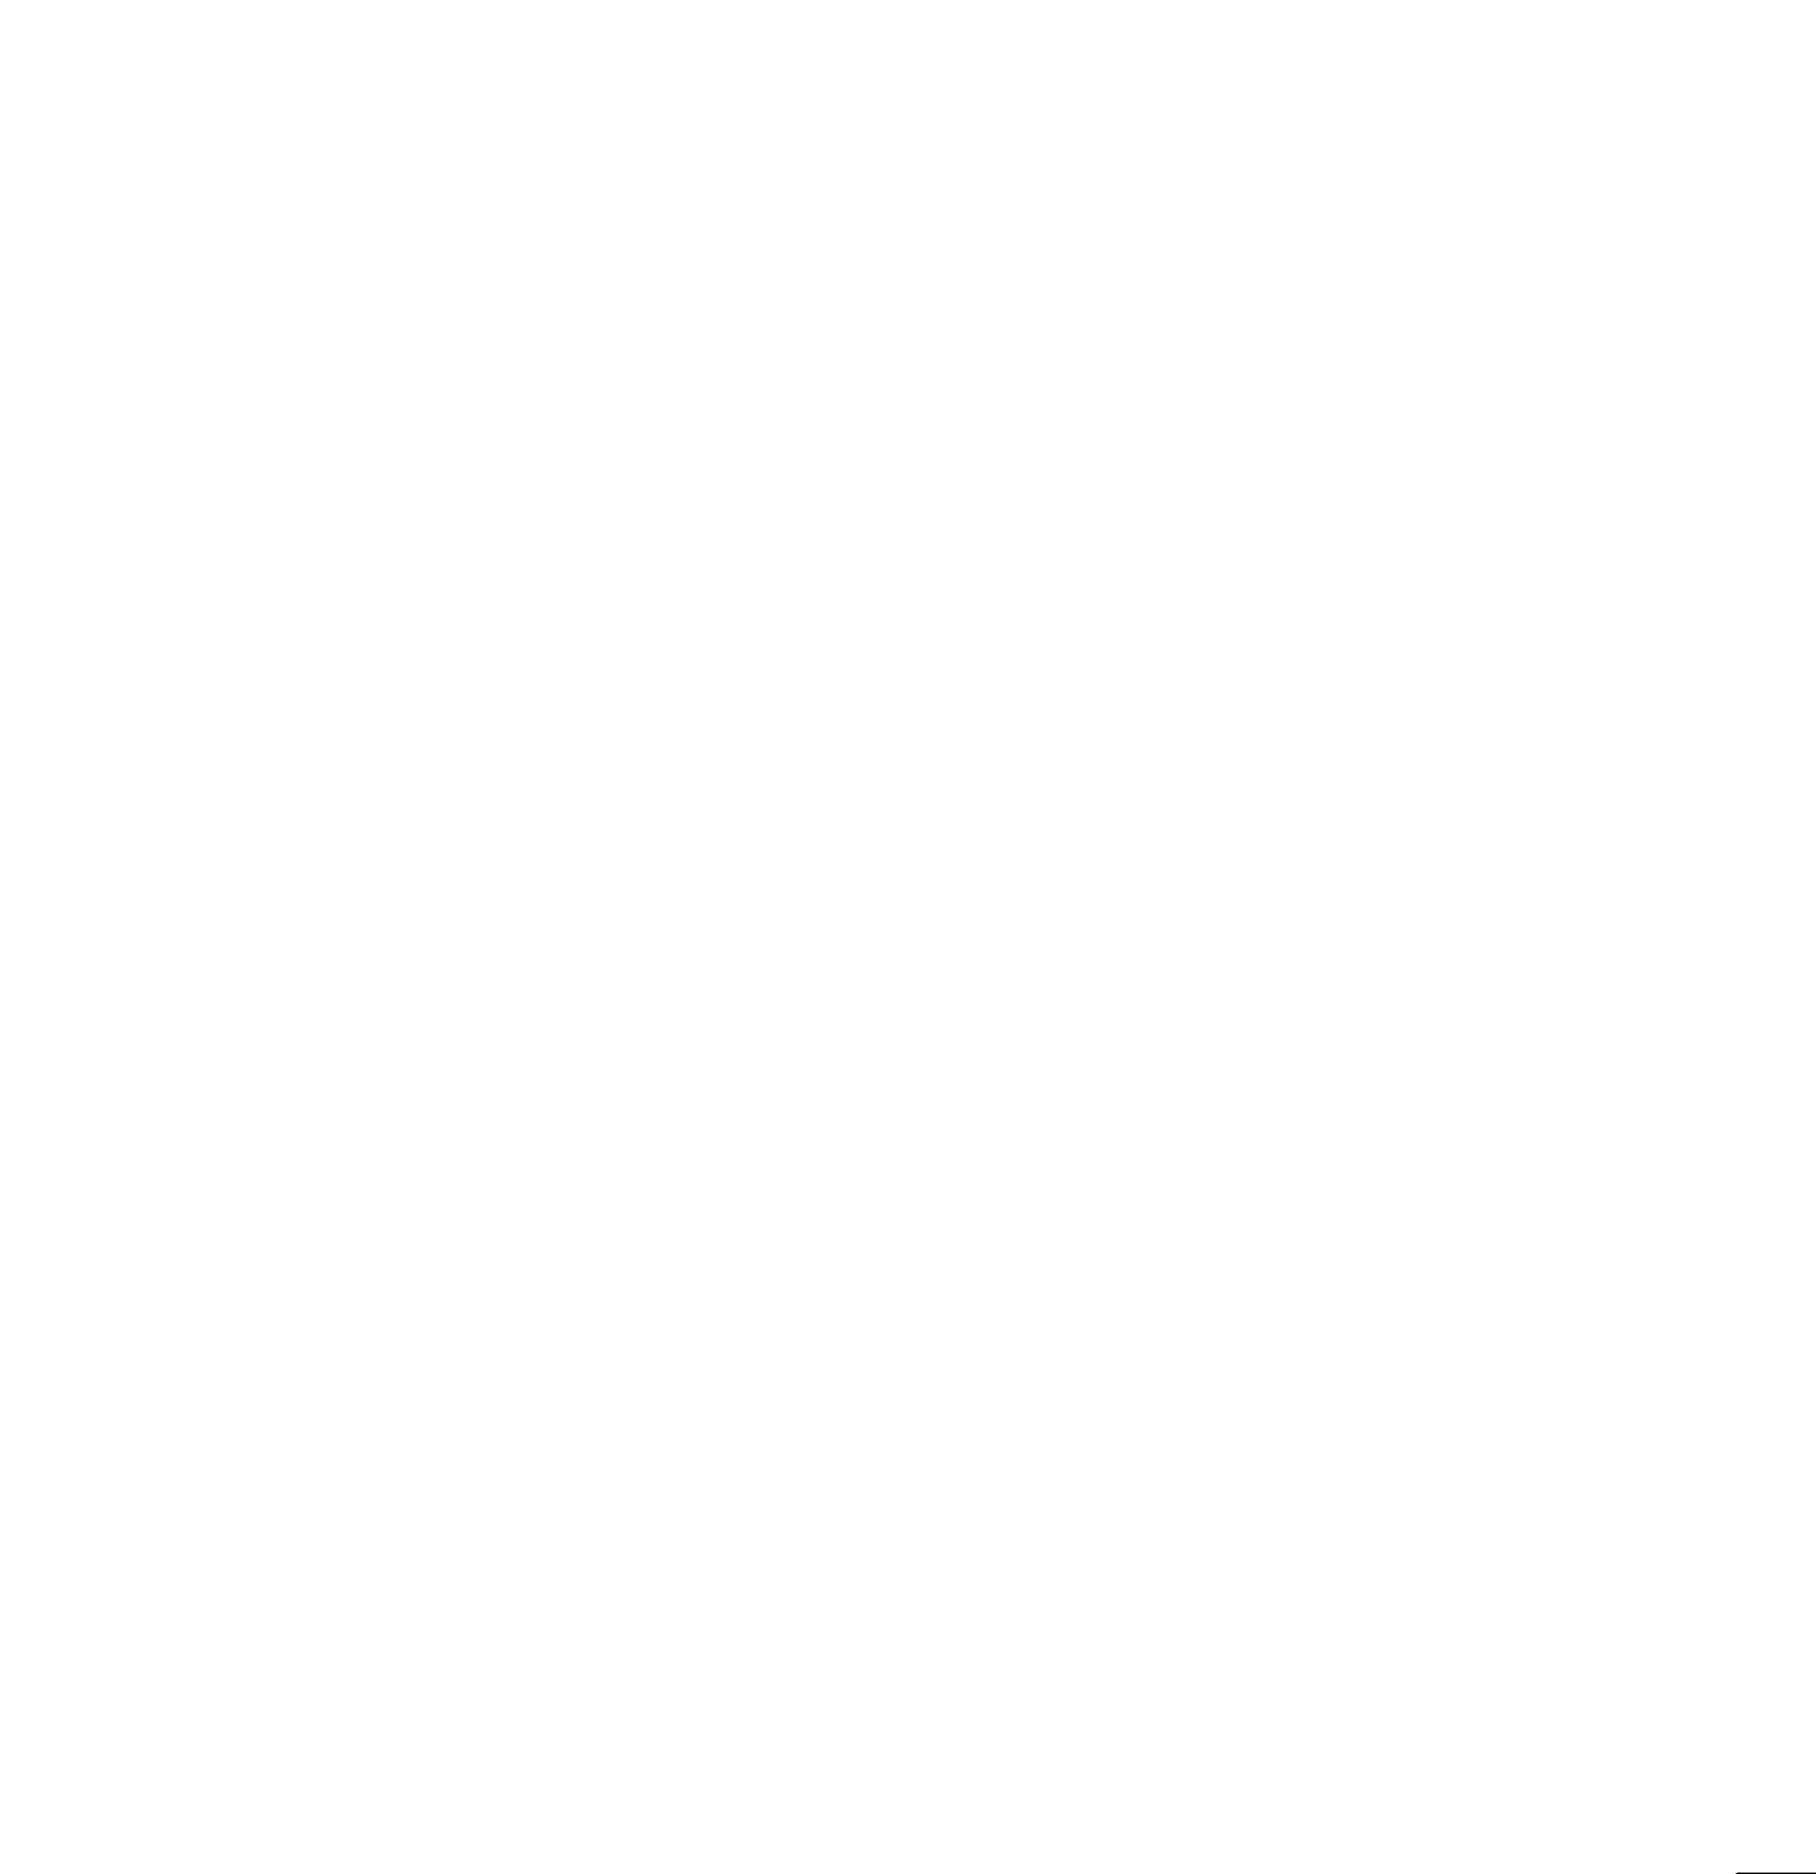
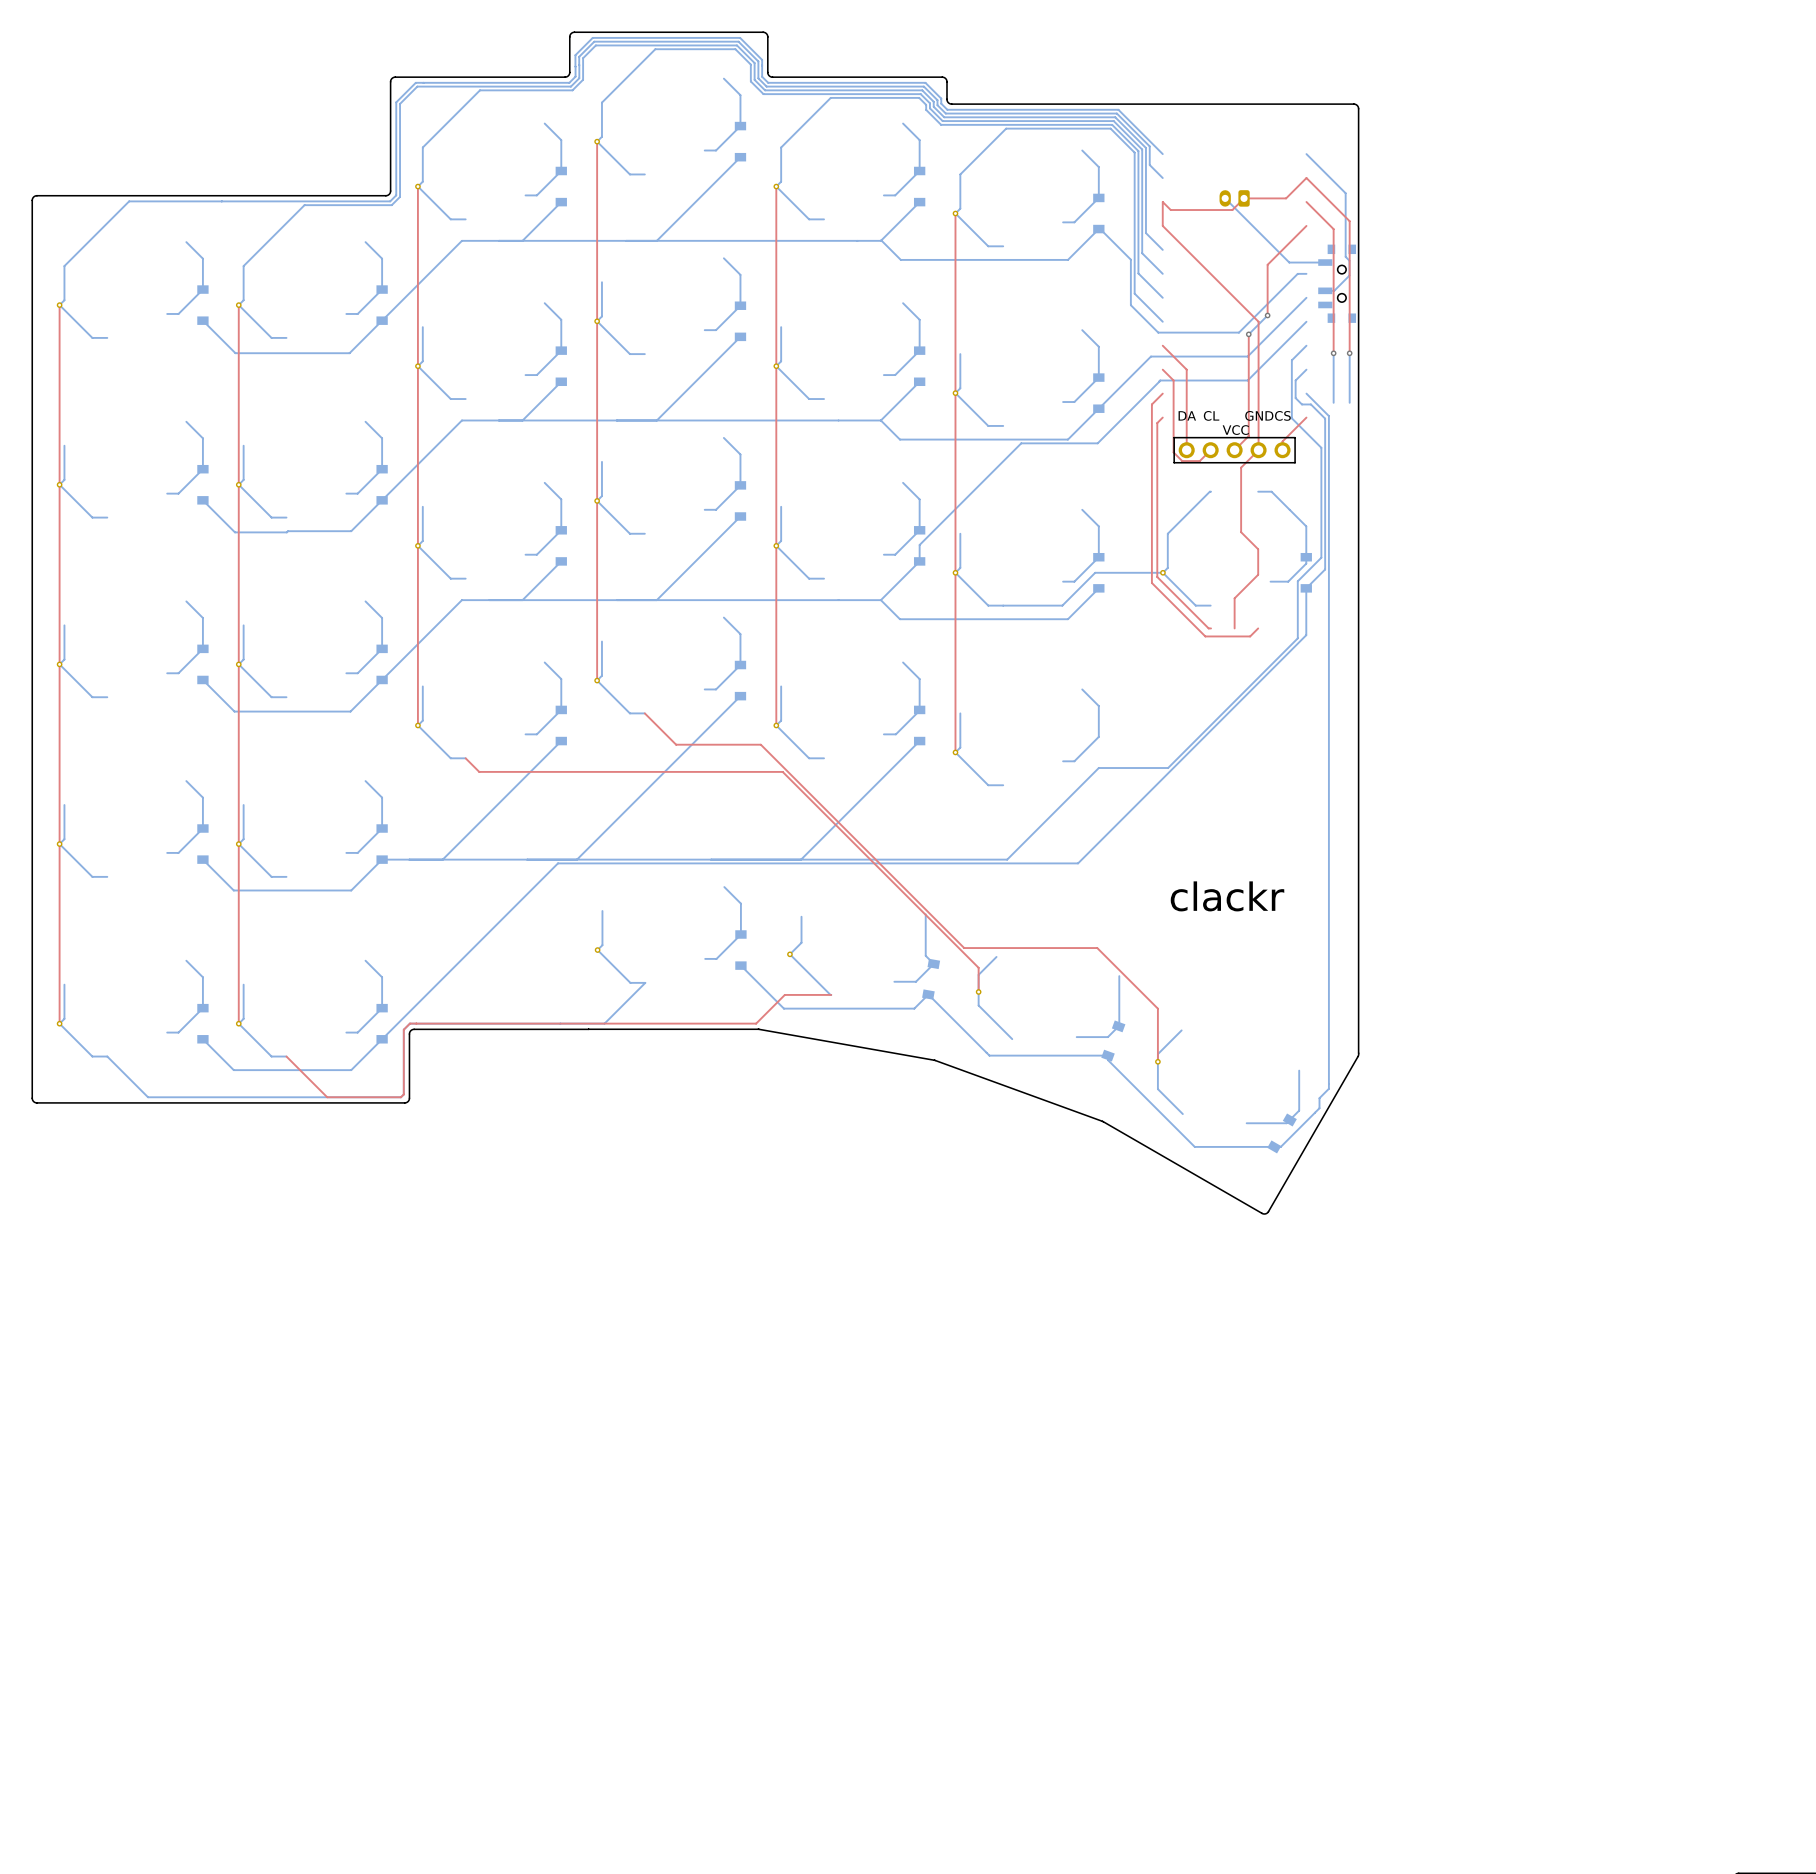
bottom track: none -> (579, 64) (579, 56) (594, 41) (738, 41) (758, 61) (758, 78) (766, 86) (923, 86) (937, 100) (937, 105) (945, 113) (1116, 113) (1149, 146) (1149, 165) (1162, 178)
bottom track: none -> (579, 65) (579, 78) (570, 86) (417, 86) (400, 103) (400, 196) (391, 205) (304, 205) (243, 266) (243, 300) (238, 305) (271, 337) (286, 337)
bottom track: none -> (575, 66) (575, 55) (592, 37) (740, 37) (762, 59) (762, 76) (768, 82) (925, 82) (941, 98)
bottom track: none -> (575, 66) (575, 76) (569, 82) (415, 82) (396, 102) (396, 195) (390, 201) (129, 201) (64, 266) (64, 300) (59, 305) (92, 337) (107, 337)
bottom track: none -> (723, 78) (740, 95) (740, 126) (716, 150) (704, 150)
bottom track: none -> (941, 98) (941, 103) (947, 109) (1118, 109) (1162, 154)
bottom track: none -> (544, 123) (561, 140) (561, 170) (536, 195) (525, 195)
bottom track: none -> (903, 123) (919, 140) (919, 170) (895, 195) (883, 195)
top track: none -> (597, 141) (597, 680)
part: none -> (597, 141)
part: none -> (740, 141)
bottom track: none -> (1082, 150) (1098, 167) (1098, 197) (1074, 222) (1063, 222)
bottom track: none -> (1306, 154) (1345, 193) (1345, 256) (1349, 260) (1349, 275) (1334, 290) (1325, 290)
bottom track: none -> (740, 157) (656, 240)
bottom track: none -> (644, 174) (629, 174) (597, 141) (601, 136) (601, 102) (655, 49) (735, 49) (750, 64) (750, 81) (763, 94) (920, 94) (929, 103) (929, 108) (942, 121) (1113, 121) (1142, 149) (1142, 253) (1162, 273)
top track: none -> (417, 186) (417, 725)
part: none -> (417, 186)
part: none -> (561, 186)
top track: none -> (776, 186) (776, 725)
part: none -> (776, 186)
part: none -> (919, 186)
bottom track: none -> (1225, 198) (1289, 262) (1325, 262)
part: none -> (1234, 198)
top track: none -> (1306, 201) (1333, 229) (1333, 353)
bottom track: none -> (561, 202) (522, 240)
bottom track: none -> (919, 202) (880, 240) (461, 240) (349, 353) (235, 353) (202, 320)
top track: none -> (955, 213) (955, 752)
part: none -> (955, 213)
part: none -> (1098, 213)
bottom track: none -> (465, 219) (450, 219) (417, 186) (422, 181) (422, 147) (479, 90) (572, 90) (583, 79) (583, 58) (595, 45) (737, 45) (754, 63) (754, 79) (765, 90) (922, 90) (933, 101) (933, 106) (944, 117) (1115, 117) (1145, 147) (1145, 233) (1162, 249)
bottom track: none -> (824, 219) (809, 219) (776, 186) (781, 181) (781, 147) (830, 97) (919, 97) (926, 104) (926, 109) (941, 124) (1112, 124) (1138, 151) (1138, 273) (1162, 297)
top track: none -> (1306, 225) (1267, 264) (1267, 315)
bottom track: none -> (881, 240) (900, 259) (1067, 259) (1100, 229) (1130, 259) (1130, 305) (1158, 332) (1239, 332) (1297, 273) (1306, 273)
bottom track: none -> (186, 242) (202, 258) (202, 289) (178, 313) (167, 313)
bottom track: none -> (365, 242) (382, 258) (382, 289) (357, 313) (346, 313)
bottom track: none -> (1003, 246) (988, 246) (955, 213) (960, 208) (960, 174) (1006, 128) (1110, 128) (1134, 152) (1134, 293) (1162, 321)
bottom track: none -> (723, 258) (740, 274) (740, 305) (716, 330) (704, 330)
bottom track: none -> (601, 282) (601, 316) (597, 321) (629, 354) (644, 354)
part: none -> (1337, 283)
bottom track: none -> (1306, 297) (1247, 356) (1150, 356) (1067, 439) (899, 439) (880, 420)
bottom track: none -> (544, 303) (561, 319) (561, 350) (536, 375) (525, 375)
bottom track: none -> (903, 303) (919, 319) (919, 350) (895, 375) (883, 375)
top track: none -> (59, 305) (59, 1023)
part: none -> (59, 305)
part: none -> (202, 305)
top track: none -> (238, 305) (238, 1023)
part: none -> (238, 305)
part: none -> (382, 305)
bottom track: none -> (1267, 315) (1248, 334)
via: none -> (1267, 315)
part: none -> (597, 321)
part: none -> (740, 321)
bottom track: none -> (1306, 321) (1247, 380) (1160, 380) (1097, 443) (1021, 443) (919, 544) (919, 561) (880, 600)
bottom track: none -> (422, 327) (422, 361) (417, 366) (450, 399) (465, 399)
bottom track: none -> (781, 327) (781, 361) (776, 366) (809, 399) (824, 399)
bottom track: none -> (1082, 330) (1098, 346) (1098, 377) (1074, 402) (1063, 402)
top track: none -> (1248, 334) (1248, 436) (1234, 450)
via: none -> (1248, 334)
bottom track: none -> (740, 336) (656, 420)
top track: none -> (1162, 345) (1186, 369) (1186, 450)
bottom track: none -> (1306, 345) (1291, 360) (1291, 418) (1321, 447) (1321, 557) (1297, 581) (1297, 638) (1168, 768) (1098, 768) (1007, 859) (382, 859) (351, 890) (233, 890) (202, 859)
bottom track: none -> (1333, 353) (1333, 402)
via: none -> (1333, 353)
top track: none -> (1349, 353) (1349, 221) (1306, 178) (1286, 198) (1244, 198) (1232, 210) (1170, 210) (1162, 201) (1162, 225) (1258, 321) (1258, 450) (1241, 467) (1241, 532) (1258, 549) (1258, 574) (1234, 598) (1234, 628)
bottom track: none -> (1349, 353) (1349, 402)
via: none -> (1349, 353)
bottom track: none -> (960, 354) (960, 388) (955, 393) (988, 425) (1003, 425)
part: none -> (417, 366)
part: none -> (561, 366)
part: none -> (776, 366)
part: none -> (919, 366)
top track: none -> (1162, 369) (1173, 380) (1173, 452) (1182, 461) (1199, 461) (1210, 450)
bottom track: none -> (1306, 369) (1295, 380) (1295, 398) (1301, 404) (1310, 404) (1325, 418) (1325, 569) (1306, 588) (1306, 635) (1078, 863) (557, 863) (351, 1070) (233, 1070) (202, 1039)
bottom track: none -> (561, 381) (522, 420)
bottom track: none -> (919, 381) (880, 420)
part: none -> (955, 393)
part: none -> (1098, 393)
top track: none -> (1162, 393) (1151, 404) (1151, 583) (1205, 636) (1250, 636) (1258, 628)
bottom track: none -> (1306, 393) (1328, 416) (1328, 1088) (1319, 1098) (1319, 1108) (1280, 1146) (1194, 1146) (1108, 1060) (1108, 1055) (989, 1055) (928, 994) (914, 1008) (783, 1008) (740, 965)
top track: none -> (1162, 417) (1157, 423) (1157, 577) (1208, 628) (1211, 628)
top track: none -> (1306, 417) (1282, 441) (1282, 450)
bottom track: none -> (880, 420) (461, 420) (351, 531) (235, 532) (202, 500)
bottom track: none -> (186, 421) (202, 438) (202, 469) (178, 493) (167, 493)
bottom track: none -> (365, 421) (382, 438) (382, 469) (357, 493) (346, 493)
bottom track: none -> (723, 437) (740, 454) (740, 485) (716, 509) (704, 509)
bottom track: none -> (64, 445) (64, 479) (59, 484) (92, 517) (107, 517)
bottom track: none -> (243, 445) (243, 479) (238, 484) (271, 517) (286, 517)
part: none -> (1234, 450)
bottom track: none -> (601, 461) (601, 496) (597, 500) (629, 533) (644, 533)
bottom track: none -> (544, 482) (561, 499) (561, 530) (536, 554) (525, 554)
bottom track: none -> (903, 482) (919, 499) (919, 530) (895, 554) (883, 554)
part: none -> (59, 484)
part: none -> (202, 484)
part: none -> (238, 484)
part: none -> (382, 484)
bottom track: none -> (1211, 491) (1167, 533) (1167, 567) (1162, 572)
bottom track: none -> (1258, 491) (1271, 491) (1306, 526) (1306, 563) (1288, 581) (1270, 581)
part: none -> (597, 500)
part: none -> (740, 500)
bottom track: none -> (422, 506) (422, 540) (417, 545) (450, 578) (465, 578)
bottom track: none -> (781, 506) (781, 540) (776, 545) (809, 578) (824, 578)
bottom track: none -> (1082, 509) (1098, 526) (1098, 557) (1074, 581) (1063, 581)
bottom track: none -> (740, 516) (656, 600)
bottom track: none -> (960, 533) (960, 567) (955, 572) (988, 605) (1062, 605) (1095, 572) (1162, 572)
part: none -> (417, 545)
part: none -> (561, 545)
part: none -> (776, 545)
part: none -> (919, 545)
bottom track: none -> (561, 561) (522, 600)
part: none -> (955, 572)
part: none -> (1098, 572)
bottom track: none -> (1162, 572) (1195, 605) (1210, 605)
part: none -> (1162, 572)
part: none -> (1306, 572)
bottom track: none -> (1098, 588) (1067, 619) (899, 619) (880, 600)
bottom track: none -> (880, 600) (461, 600) (350, 711) (234, 711) (202, 679)
bottom track: none -> (186, 601) (202, 618) (202, 648) (178, 673) (167, 673)
bottom track: none -> (365, 601) (382, 618) (382, 648) (357, 673) (346, 673)
bottom track: none -> (723, 617) (740, 634) (740, 665) (716, 689) (704, 689)
bottom track: none -> (64, 625) (64, 659) (59, 664) (92, 697) (107, 697)
bottom track: none -> (243, 625) (243, 659) (238, 664) (271, 697) (286, 697)
bottom track: none -> (601, 641) (601, 675) (597, 680) (629, 713) (644, 713)
bottom track: none -> (544, 662) (561, 679) (561, 709) (536, 734) (525, 734)
bottom track: none -> (903, 662) (919, 679) (919, 710) (895, 734) (883, 734)
part: none -> (59, 664)
part: none -> (202, 664)
part: none -> (238, 664)
part: none -> (382, 664)
part: none -> (597, 680)
part: none -> (740, 680)
bottom track: none -> (422, 686) (422, 720) (417, 725) (450, 758) (465, 758)
bottom track: none -> (781, 686) (781, 720) (776, 725) (809, 758) (824, 758)
bottom track: none -> (1082, 689) (1098, 706) (1098, 736) (1074, 761) (1063, 761)
bottom track: none -> (740, 696) (576, 859)
top track: none -> (644, 713) (676, 744) (760, 744) (964, 948) (1097, 948) (1157, 1008) (1157, 1061)
bottom track: none -> (960, 713) (960, 747) (955, 752) (988, 785) (1003, 785)
part: none -> (417, 725)
part: none -> (561, 725)
part: none -> (776, 725)
part: none -> (919, 725)
bottom track: none -> (561, 741) (442, 859)
bottom track: none -> (919, 741) (801, 859)
part: none -> (955, 752)
top track: none -> (465, 758) (479, 771) (782, 771) (978, 967) (978, 991)
bottom track: none -> (186, 781) (202, 797) (202, 828) (178, 852) (167, 852)
bottom track: none -> (365, 781) (382, 797) (382, 828) (357, 852) (346, 852)
bottom track: none -> (64, 805) (64, 839) (59, 844) (92, 876) (107, 876)
bottom track: none -> (243, 805) (243, 839) (238, 844) (271, 876) (286, 876)
part: none -> (59, 844)
part: none -> (202, 844)
part: none -> (238, 844)
part: none -> (382, 844)
bottom track: none -> (724, 887) (740, 903) (740, 934) (716, 958) (705, 958)
text: none -> clackr (1227, 896)
bottom track: none -> (602, 911) (602, 945) (597, 950) (630, 982) (645, 982) (604, 1023) (560, 1023)
bottom track: none -> (925, 914) (925, 955) (933, 963) (915, 981) (894, 981)
bottom track: none -> (801, 916) (801, 942) (789, 954) (831, 994)
part: none -> (597, 950)
part: none -> (740, 950)
part: none -> (789, 954)
bottom track: none -> (996, 956) (978, 974) (978, 1005) (1012, 1039)
bottom track: none -> (186, 960) (202, 977) (202, 1008) (178, 1032) (167, 1032)
bottom track: none -> (365, 960) (382, 977) (382, 1008) (357, 1032) (346, 1032)
bottom track: none -> (1119, 976) (1119, 1025) (1107, 1037) (1076, 1037)
part: none -> (931, 979)
bottom track: none -> (64, 984) (64, 1018) (59, 1023) (92, 1056) (107, 1056) (148, 1097) (400, 1097) (403, 1094) (403, 1029) (409, 1023) (560, 1023)
bottom track: none -> (243, 984) (243, 1018) (238, 1023) (271, 1056) (286, 1056)
part: none -> (978, 991)
top track: none -> (831, 994) (784, 994) (756, 1023) (416, 1023)
part: none -> (59, 1023)
part: none -> (202, 1023)
part: none -> (238, 1023)
part: none -> (382, 1023)
top track: none -> (416, 1023) (409, 1023) (403, 1029) (403, 1094) (400, 1097) (327, 1097) (286, 1056)
board edge: none -> (588, 1029) (758, 1029) (934, 1060) (1102, 1121) (1262, 1213) (1268, 1212) (1358, 1054) (1358, 108) (1356, 105) (951, 104) (947, 100) (946, 81) (942, 77) (770, 76) (767, 73) (767, 36) (763, 32) (573, 32) (569, 36) (569, 73) (566, 77) (392, 78) (390, 81) (390, 191) (387, 195) (36, 195) (33, 197) (32, 1100) (36, 1102) (405, 1102) (409, 1098) (409, 1034) (412, 1029) (588, 1029)
bottom track: none -> (1181, 1030) (1157, 1054) (1157, 1089) (1182, 1114)
part: none -> (1113, 1040)
part: none -> (1157, 1061)
bottom track: none -> (1299, 1070) (1299, 1110) (1286, 1123) (1246, 1123)
part: none -> (1282, 1133)

